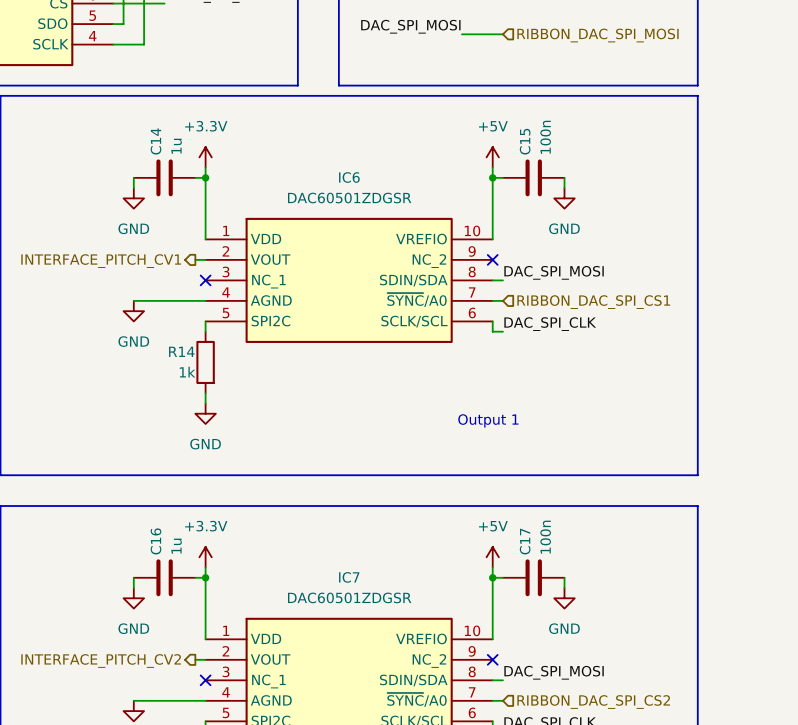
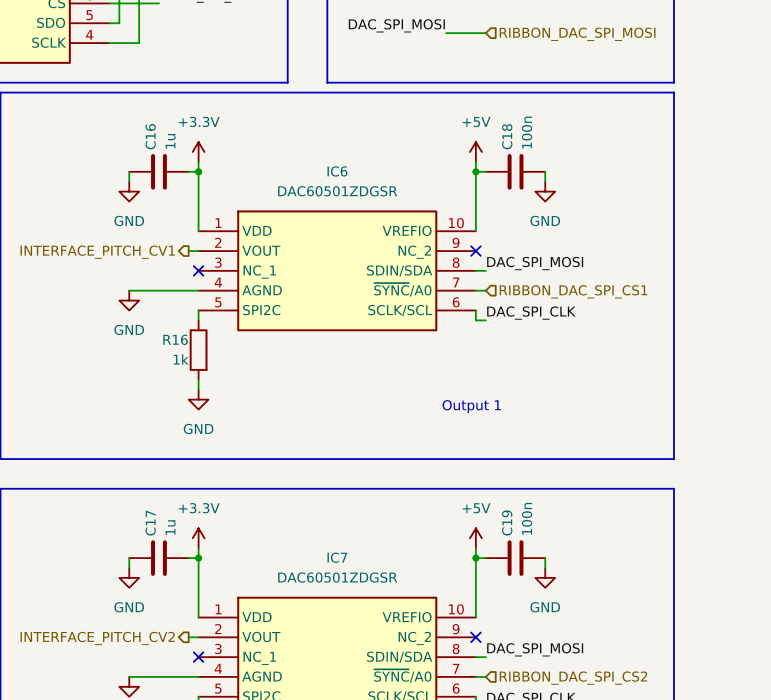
C14 name: C14 (156, 141) -> C16 (150, 136)
C15 name: C15 (525, 141) -> C18 (507, 136)
R14 name: R14 (181, 351) -> R16 (175, 339)
C16 name: C16 (156, 541) -> C17 (150, 523)
C17 name: C17 (525, 541) -> C19 (507, 523)

